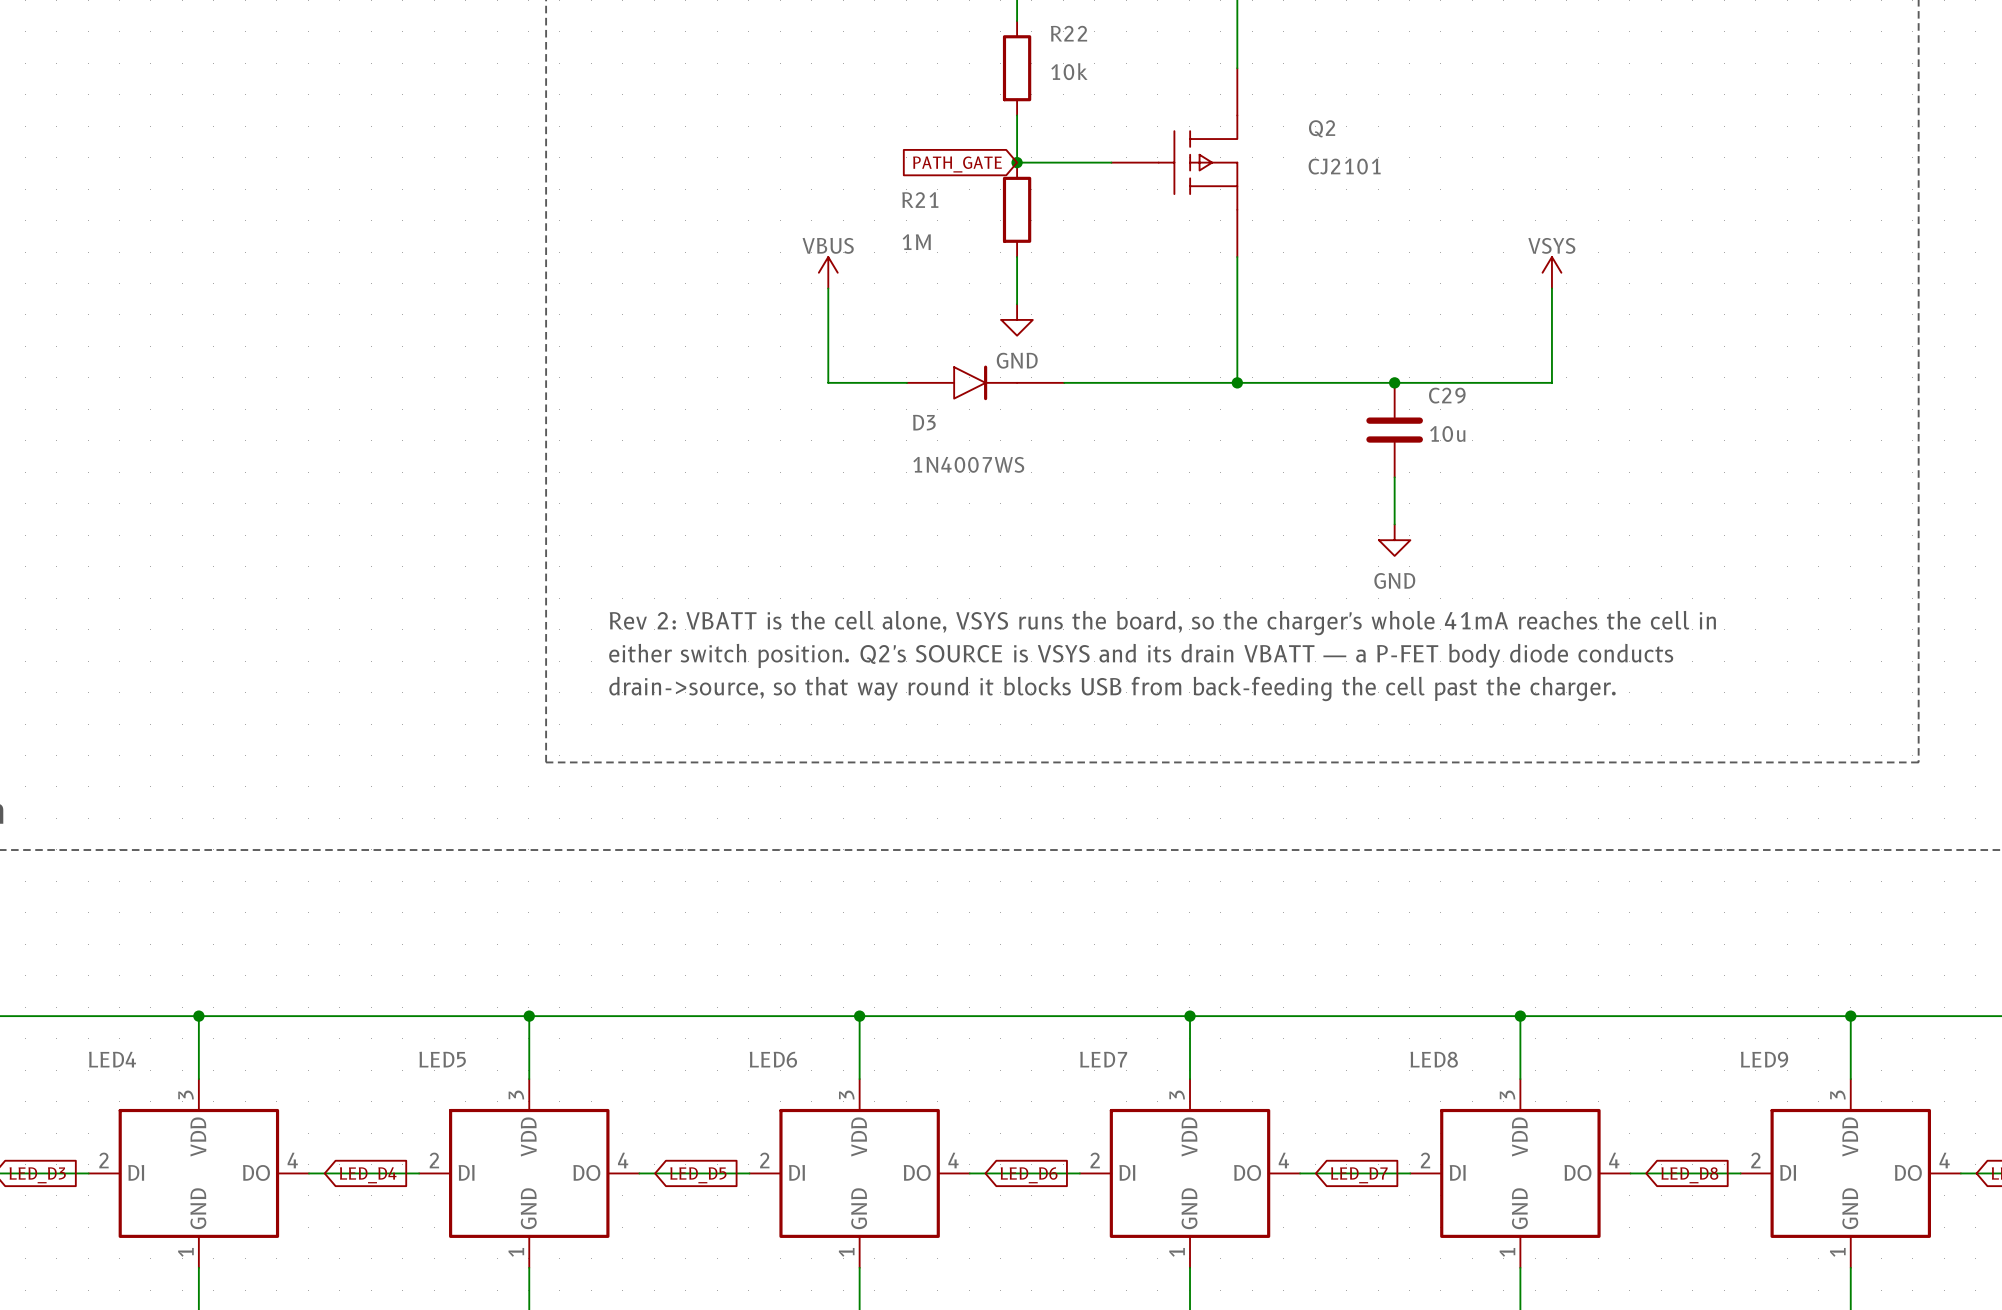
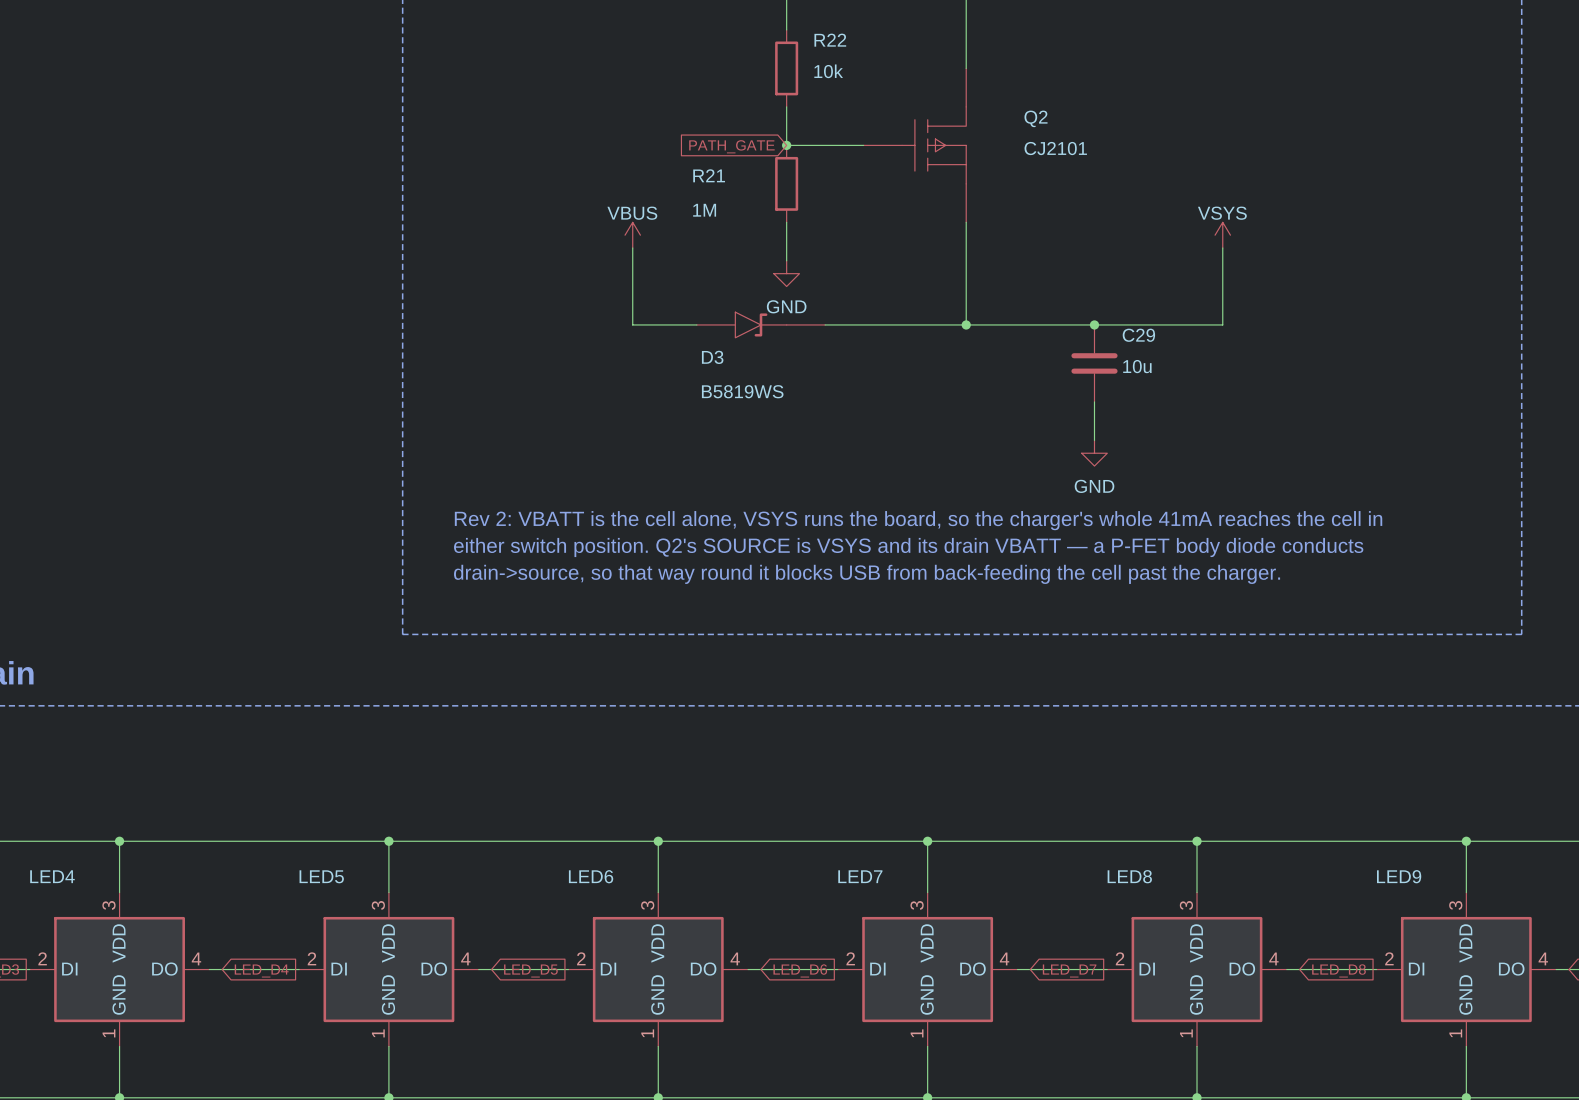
D3 symbol: [906, 365, 1065, 401] -> [696, 312, 826, 338]
D3 value: 1N4007WS (968, 464) -> B5819WS (742, 391)

